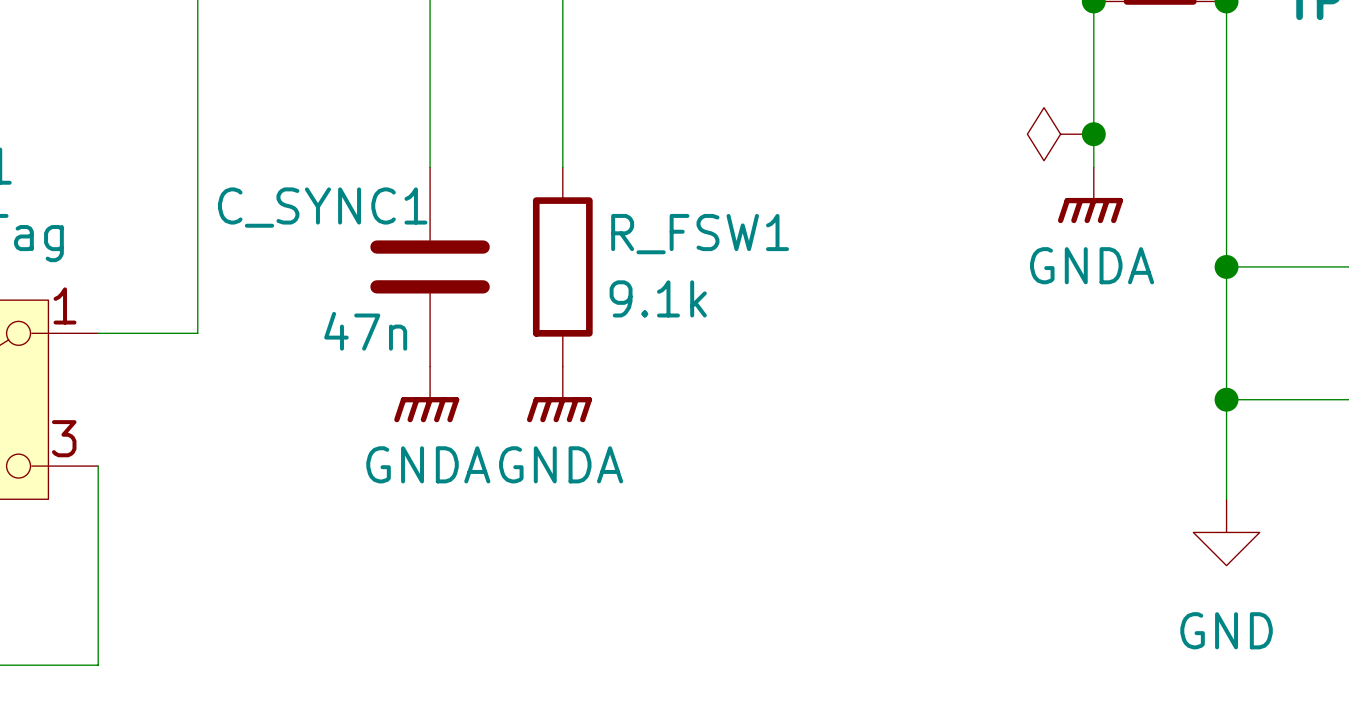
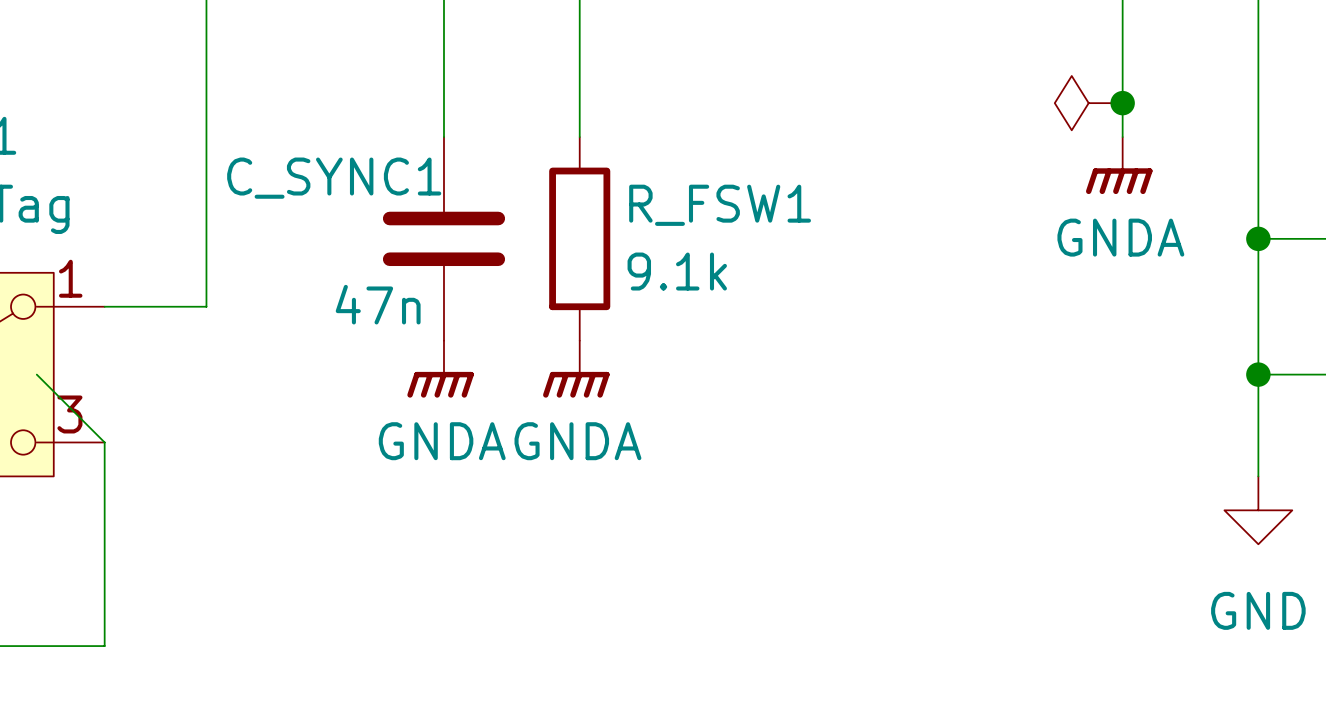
wire: none -> (36, 374) (104, 442)

